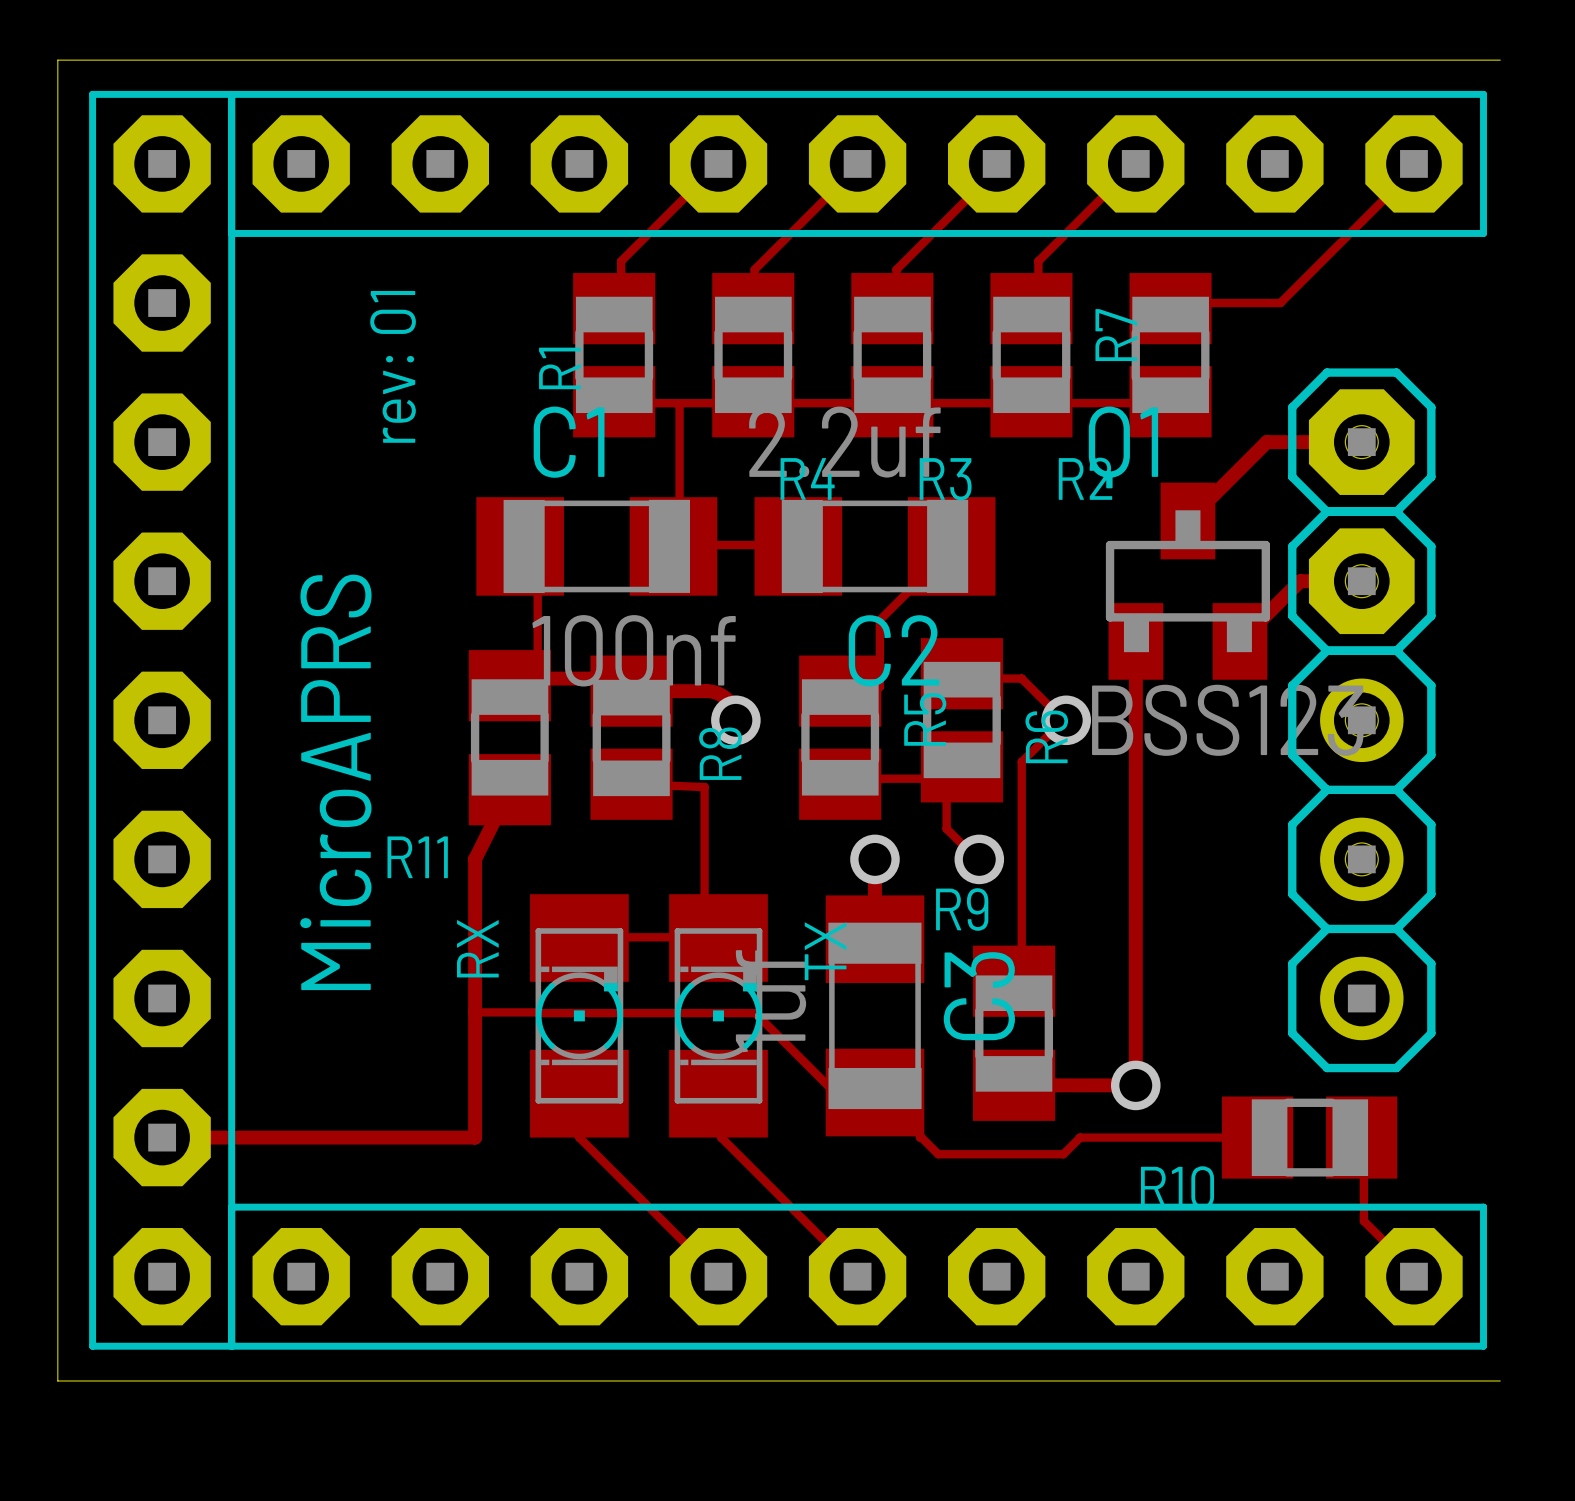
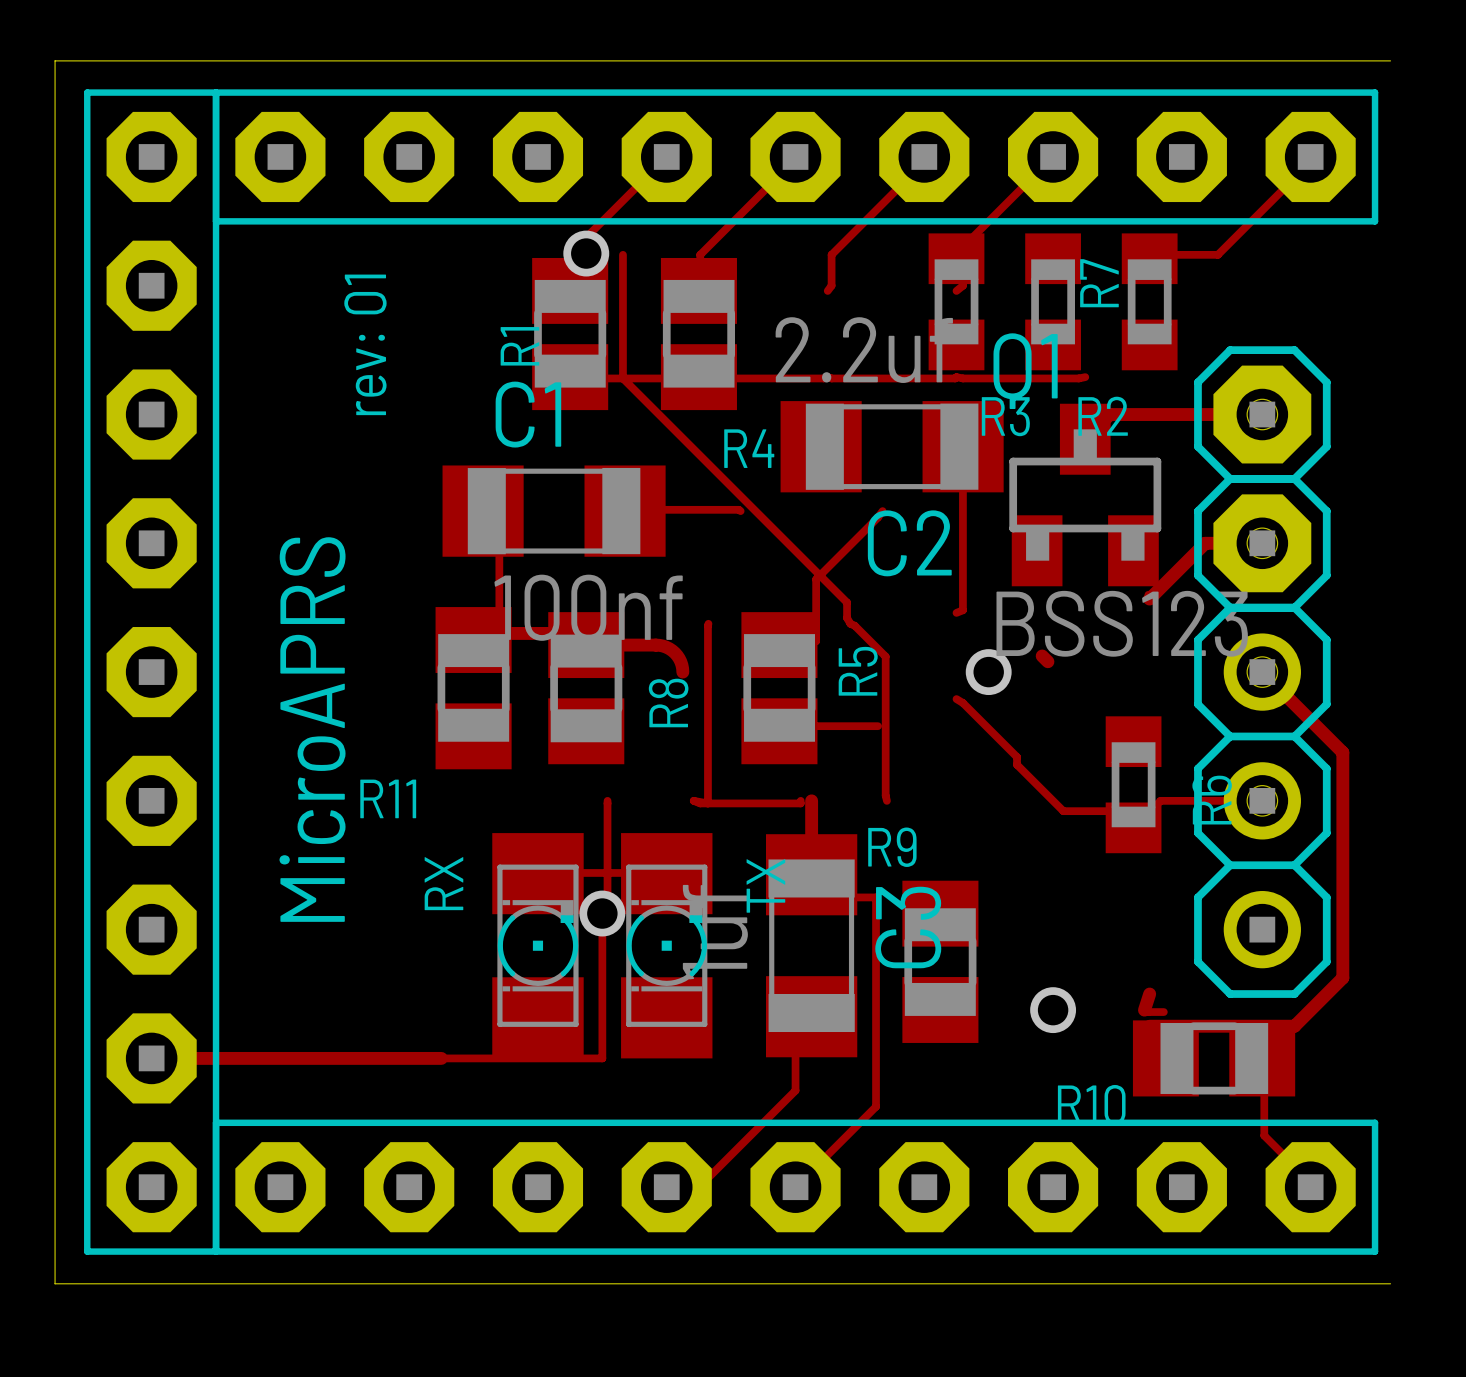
via: none -> (586, 253)
track: none -> (622, 254) (622, 378) (847, 602) (847, 617) (850, 623) (854, 625) (885, 656) (886, 800)
track: (1313, 269) (1280, 303) (1171, 303) (1170, 308) -> (1217, 254) (1156, 254) (1149, 258)
R3 footprint: [851, 273, 934, 438] -> [928, 233, 985, 371]
R2 footprint: [990, 273, 1073, 438] -> [1025, 233, 1081, 371]
R7 footprint: [1129, 273, 1212, 438] -> [1121, 233, 1178, 371]
track: (679, 403) (679, 545) (673, 546) -> none
track: (1266, 442) (1187, 520) -> (1174, 414) (1110, 414) (1085, 439)
track: none -> (963, 446) (962, 610) (956, 612)
C2 position: (874, 546) -> (892, 446)
Q1 position: (1187, 581) -> (1085, 495)
R6 footprint: [920, 638, 1003, 803] -> [1105, 716, 1162, 854]
track: (1135, 641) (1135, 1085) (1014, 1085) (1038, 1079) -> none
track: none -> (708, 623) (707, 625) (707, 803) (693, 800) (700, 803) (800, 803) (800, 800)
track: (988, 678) (961, 673) (963, 678) (1021, 678) (1063, 720) -> none
track: none -> (1042, 655) (1047, 661)
via: (735, 720) -> none
track: (1063, 720) (1021, 762) (1021, 979) (1014, 981) -> none
track: none -> (1262, 672) (1342, 752) (1342, 977) (1294, 1026) (1147, 1027)
track: none -> (956, 699) (962, 702) (1017, 757) (1017, 764) (1063, 811) (1117, 811) (1133, 827) (1160, 800) (1262, 800)
track: (946, 778) (946, 828) (979, 859) (979, 853) -> none
track: (631, 784) (704, 787) (704, 928) (712, 937) (718, 938) -> none
track: (504, 795) (537, 795) (509, 789) (475, 859) (475, 1137) -> (607, 800) (607, 911) (602, 913) (602, 1058) (441, 1058)
via: (874, 859) -> none
via: (979, 859) -> none
via: none -> (602, 913)
track: (475, 1012) (537, 1012) -> none
track: (538, 1013) (755, 1013) (829, 1087) (871, 1087) (874, 1092) (904, 1087) (920, 1137) (938, 1154) (1063, 1154) (1080, 1137) (1257, 1137) -> none
track: none -> (1149, 994) (1144, 1010) (1148, 1012) (1163, 1012)
track: (579, 1093) (579, 1137) (718, 1276) -> (803, 1010) (795, 1018) (795, 1090) (698, 1187) (666, 1187)
track: (718, 1093) (721, 1095) (721, 1137) (854, 1271) (857, 1276) -> (803, 897) (876, 897) (876, 1106) (795, 1187)

